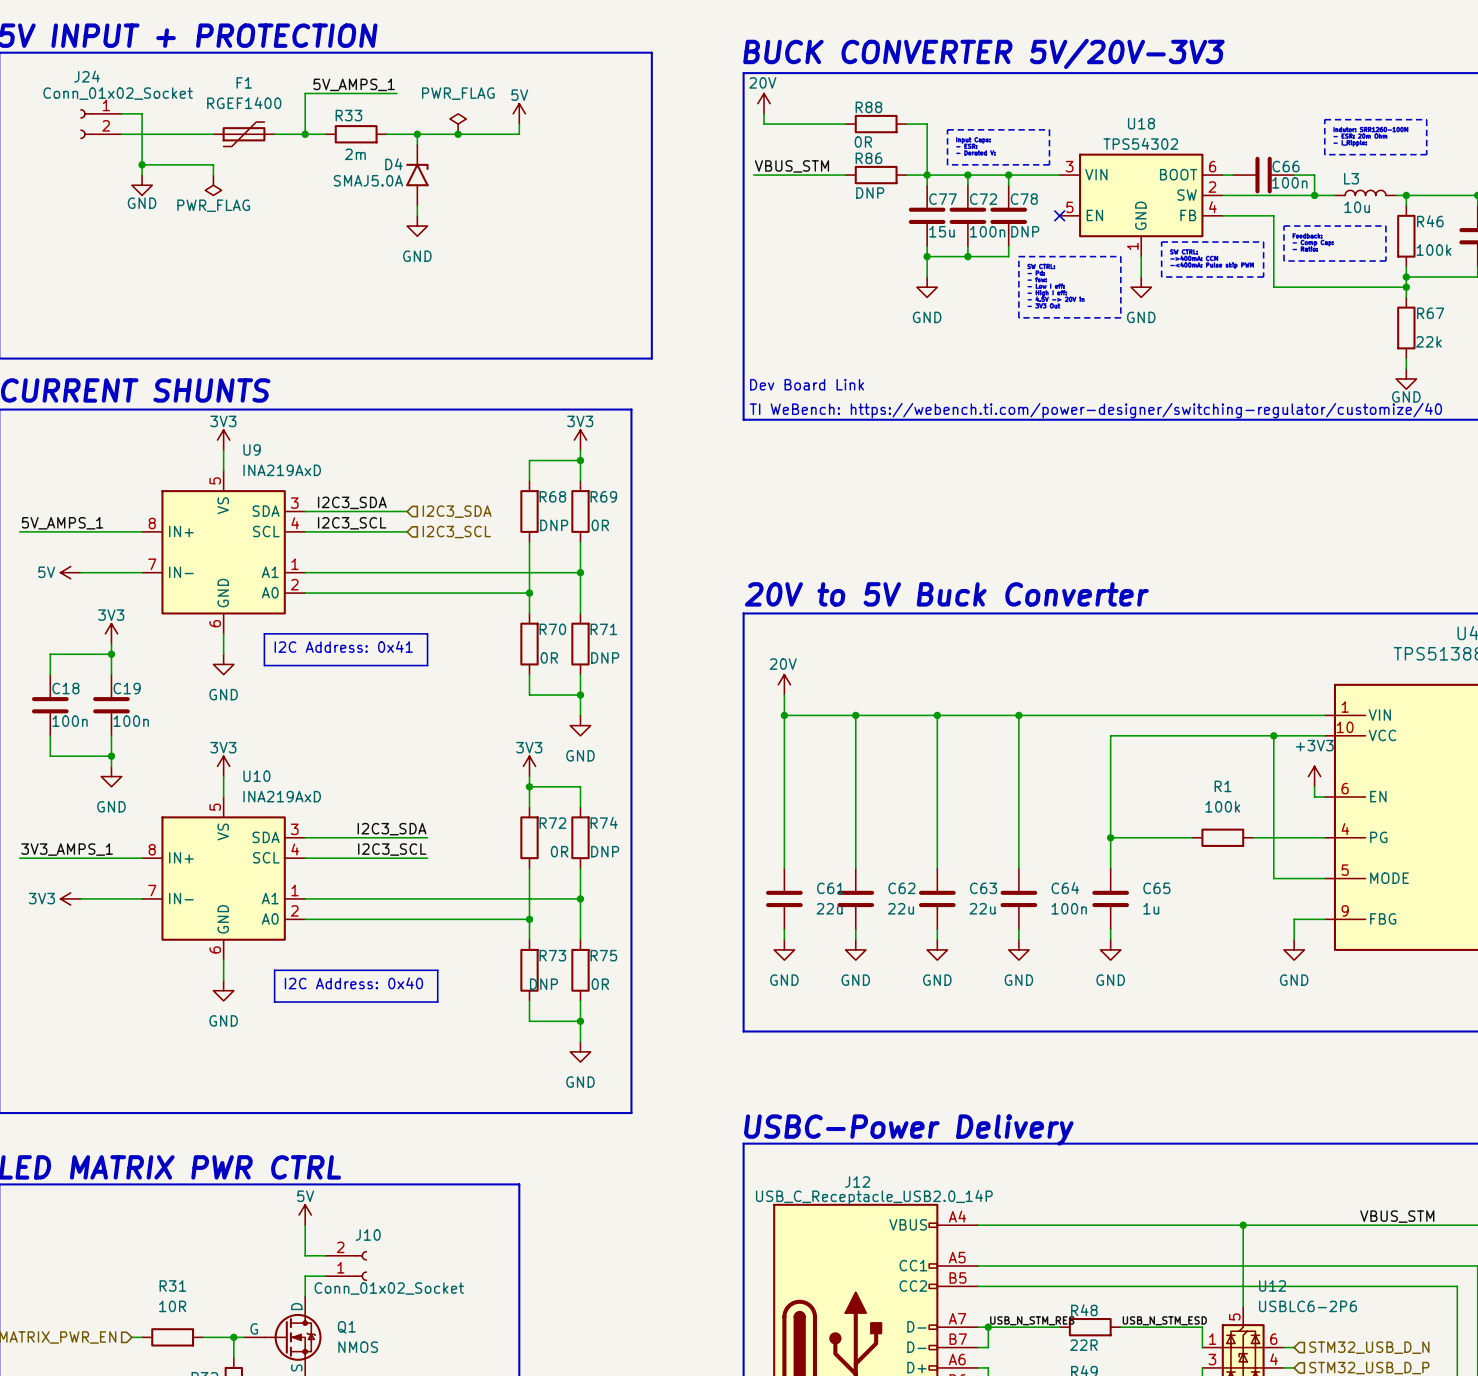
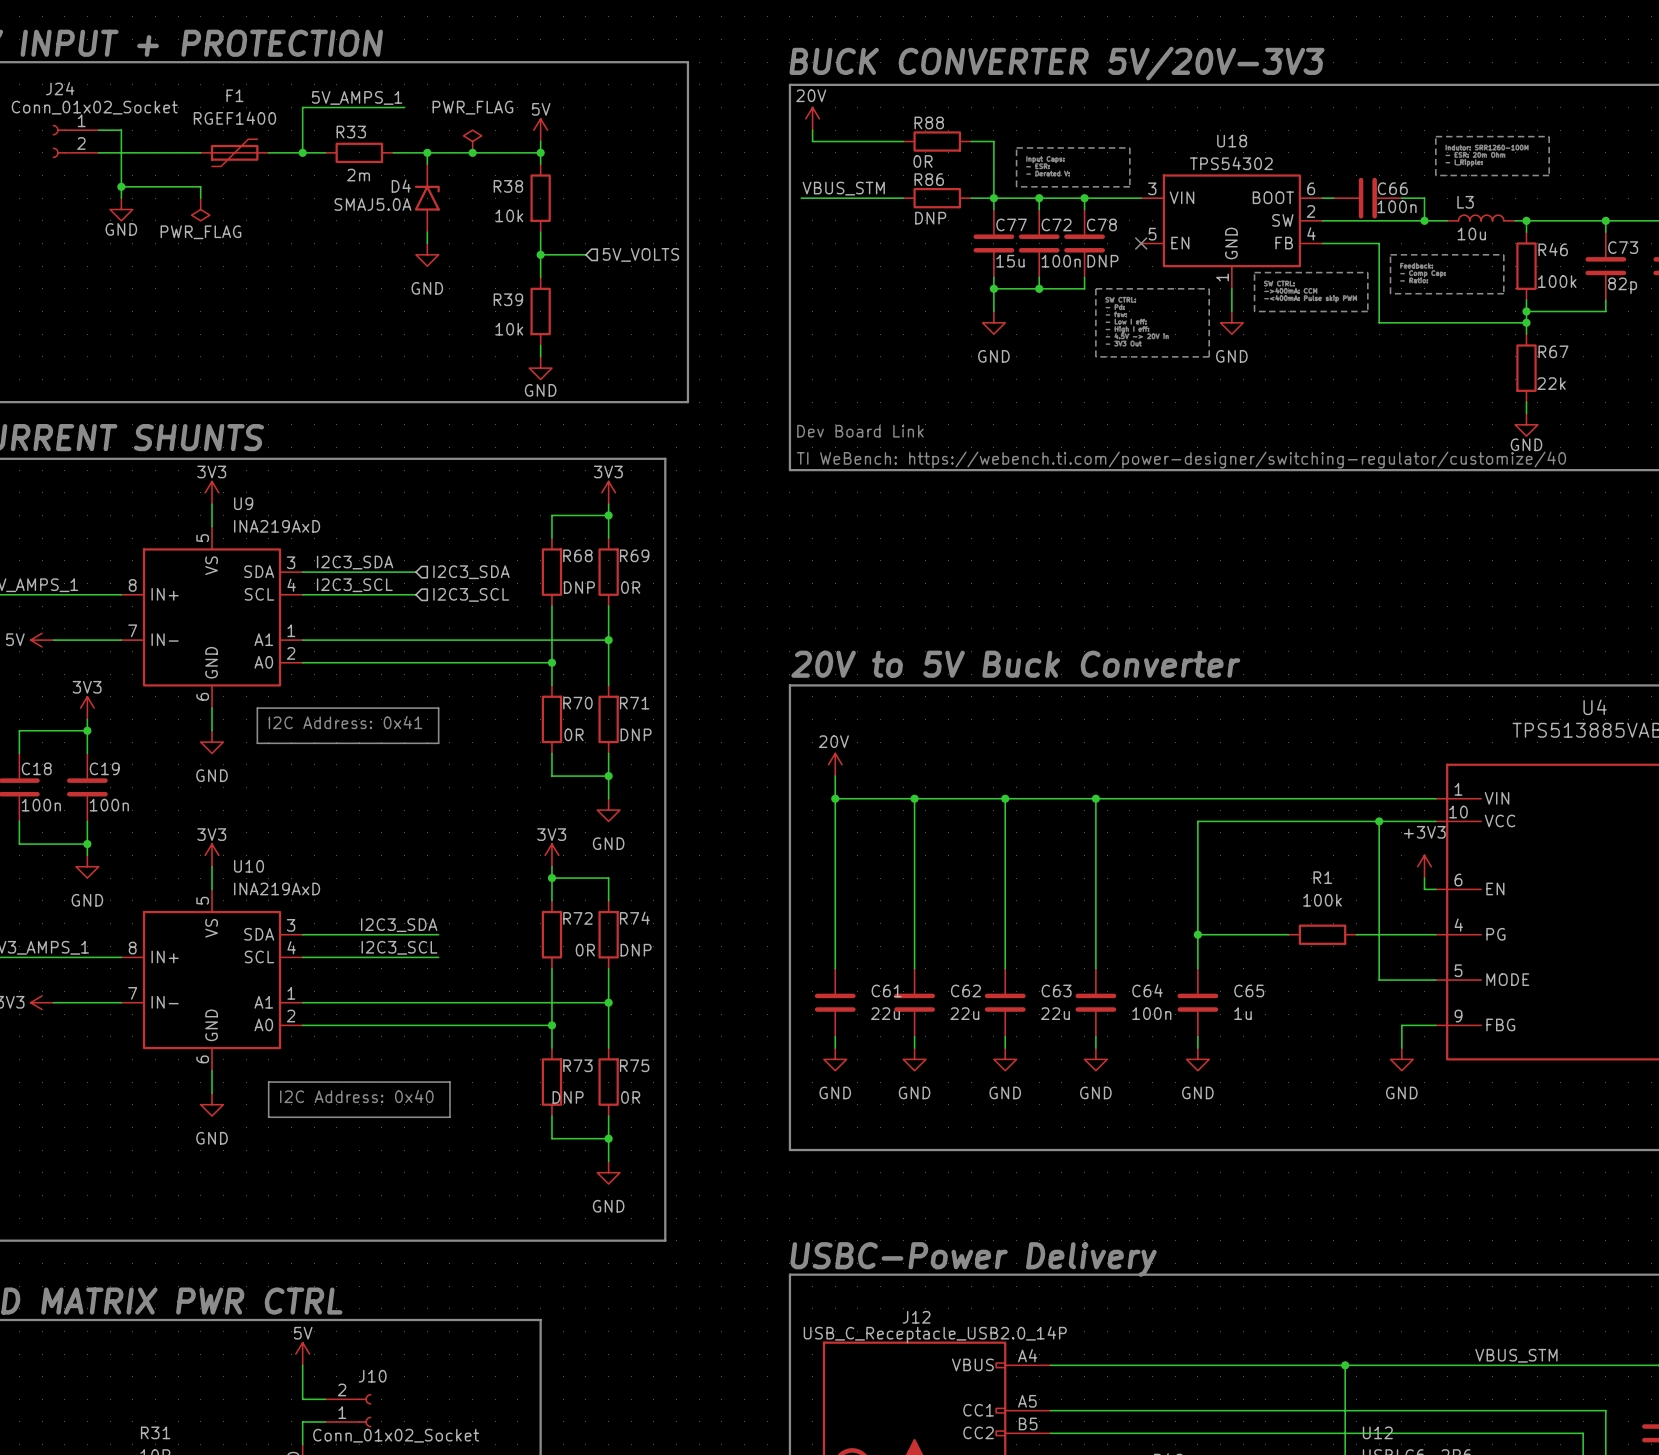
wire: none -> (540, 152) (540, 164)
junction: none -> (540, 152)
R38: none -> 10k (540, 198)
wire: none -> (540, 232) (540, 277)
wire: none -> (540, 254) (585, 254)
junction: none -> (540, 254)
hierarchical label: none -> 5V_VOLTS (640, 254)
R39: none -> 10k (540, 311)
wire: none -> (540, 345) (540, 356)
power symbol: none -> GND (540, 368)

